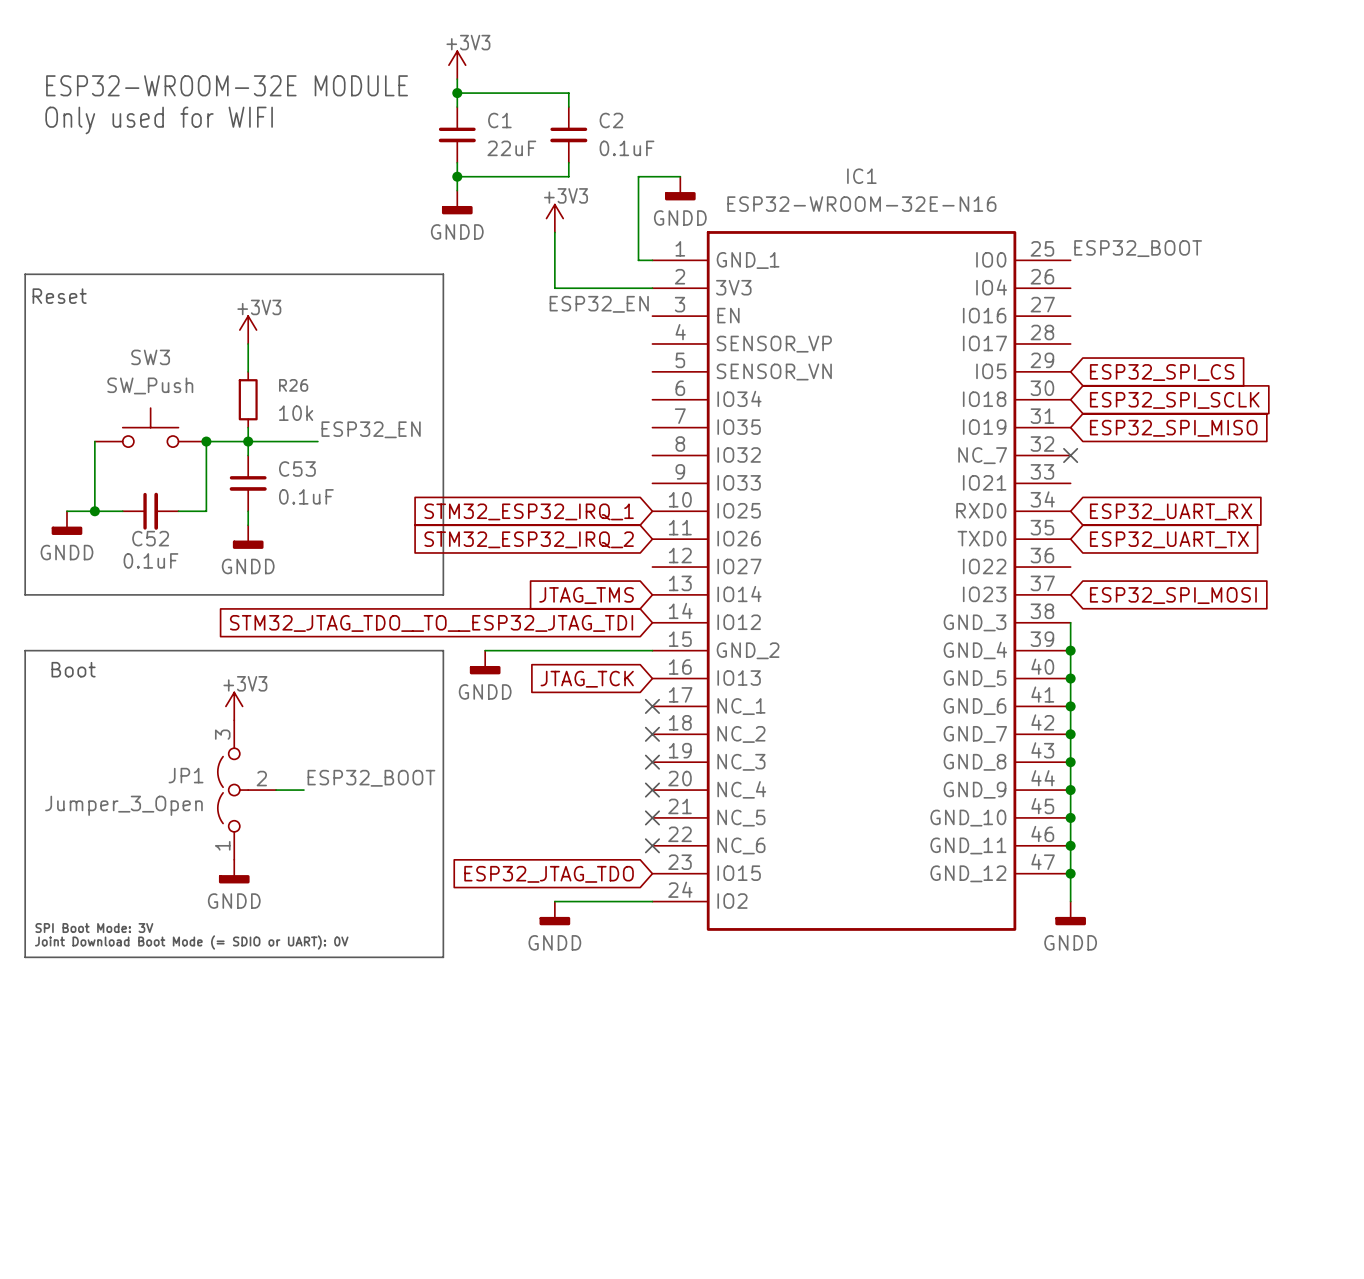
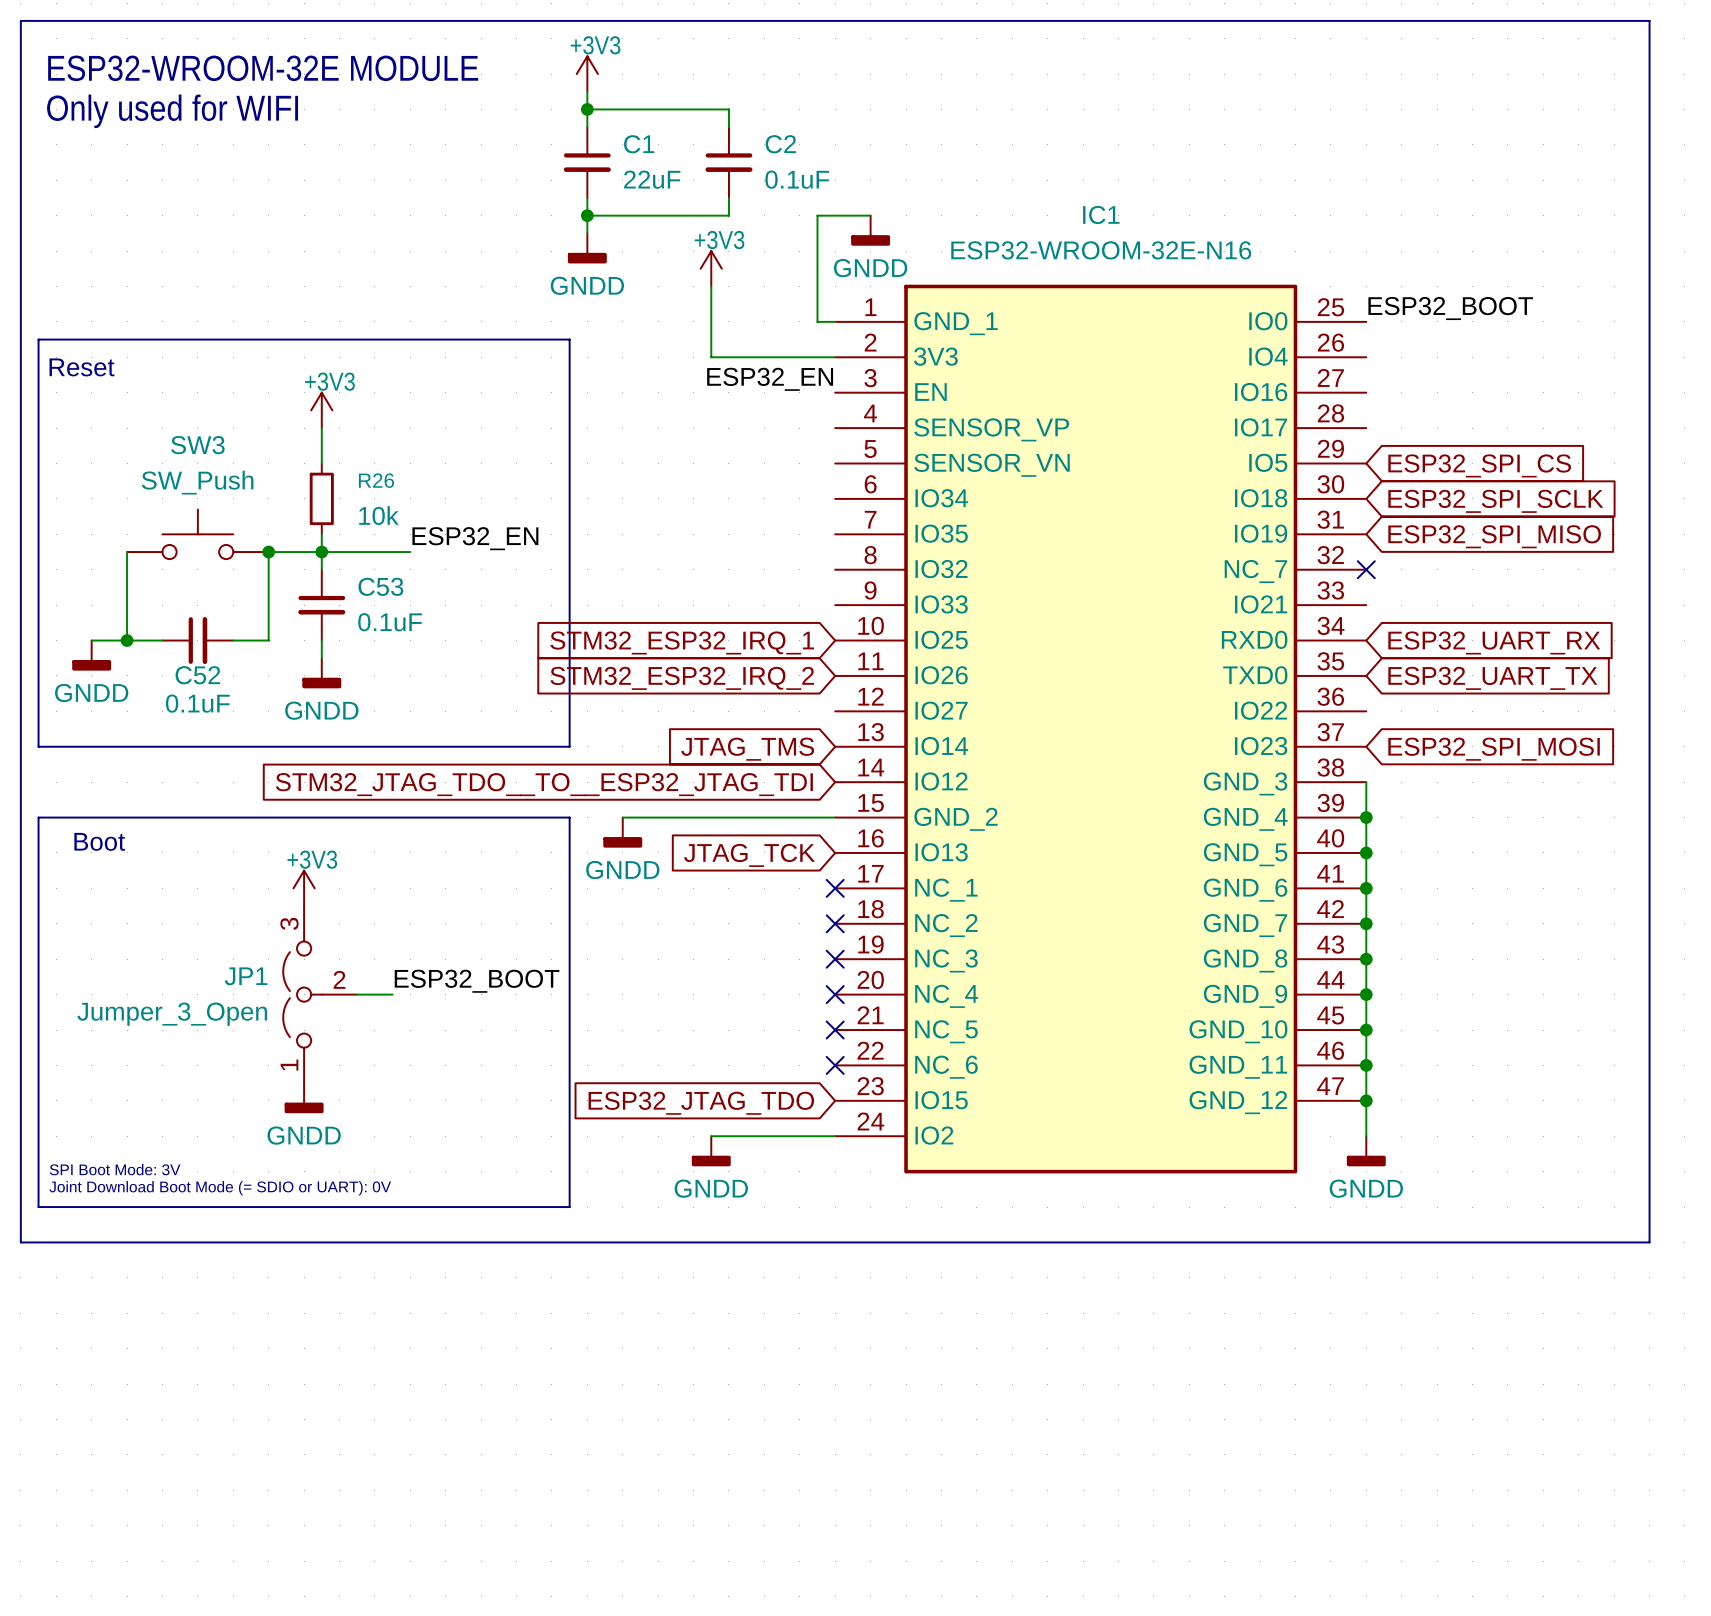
line: none -> (20, 20) (1649, 20) (1649, 1242) (20, 1242) (20, 20)
text position: ESP32-WROOM-32E MODULE (227, 85) -> ESP32-WROOM-32E MODULE (263, 68)
text position: Only used for WIFI (159, 120) -> Only used for WIFI (172, 111)

